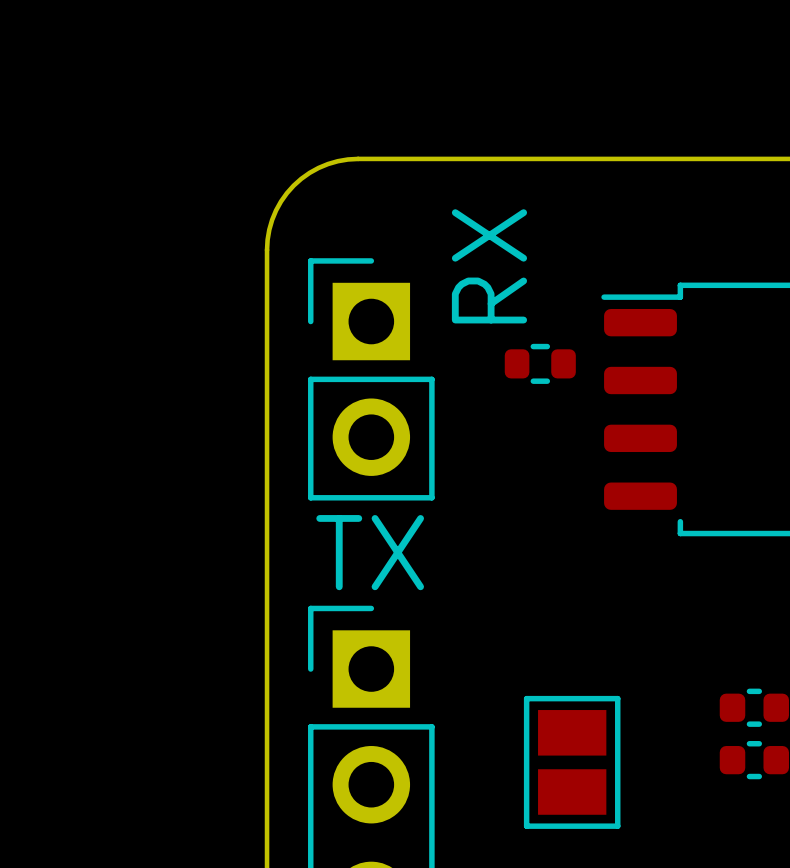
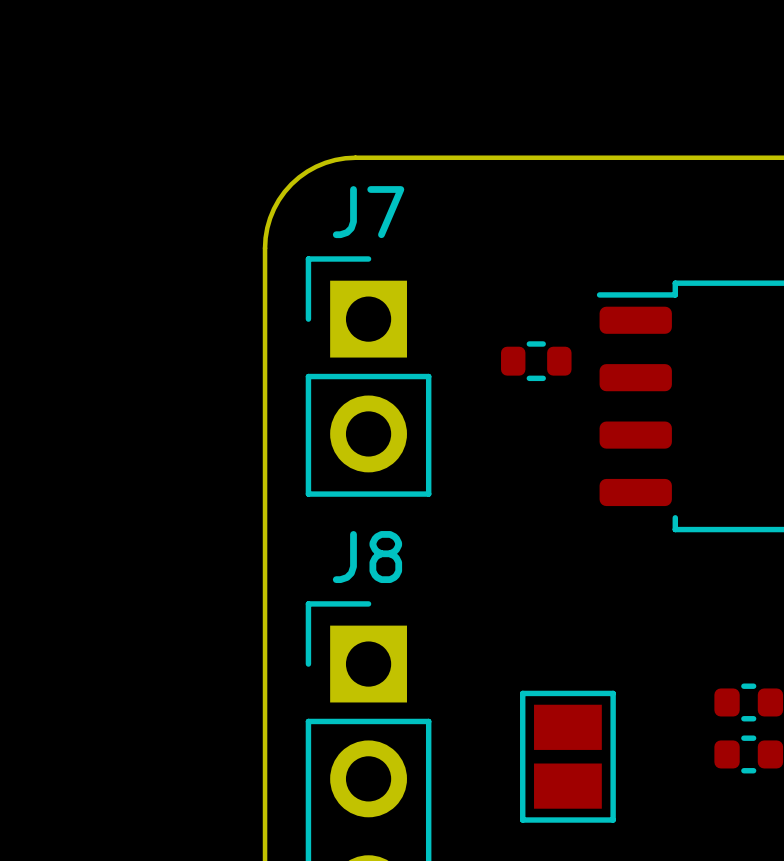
J7 name: none -> J7 (368, 212)
text: RX (489, 266) -> none
text: TX (370, 552) -> none
J8 name: none -> J8 (367, 557)

